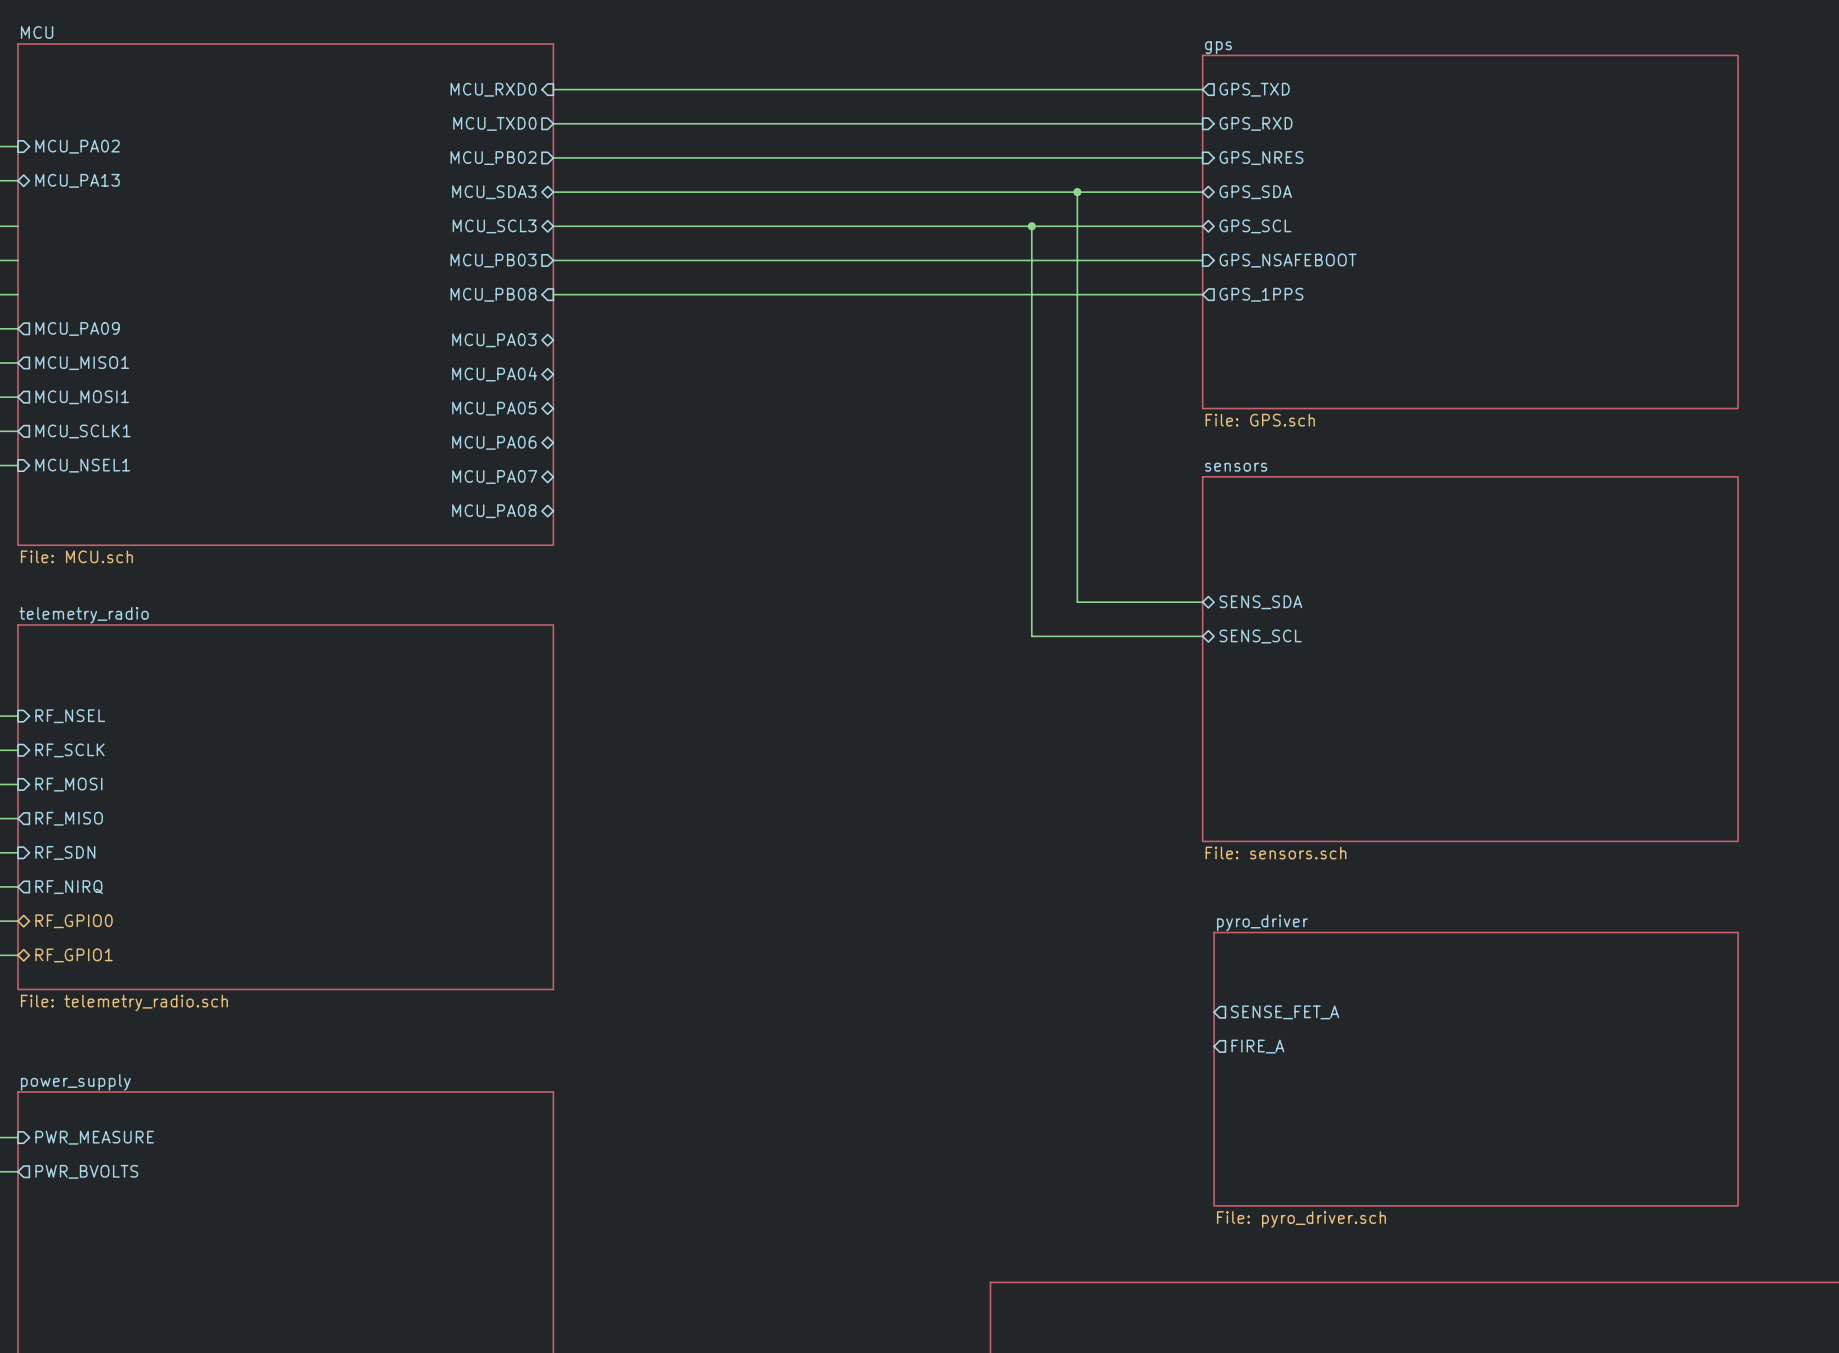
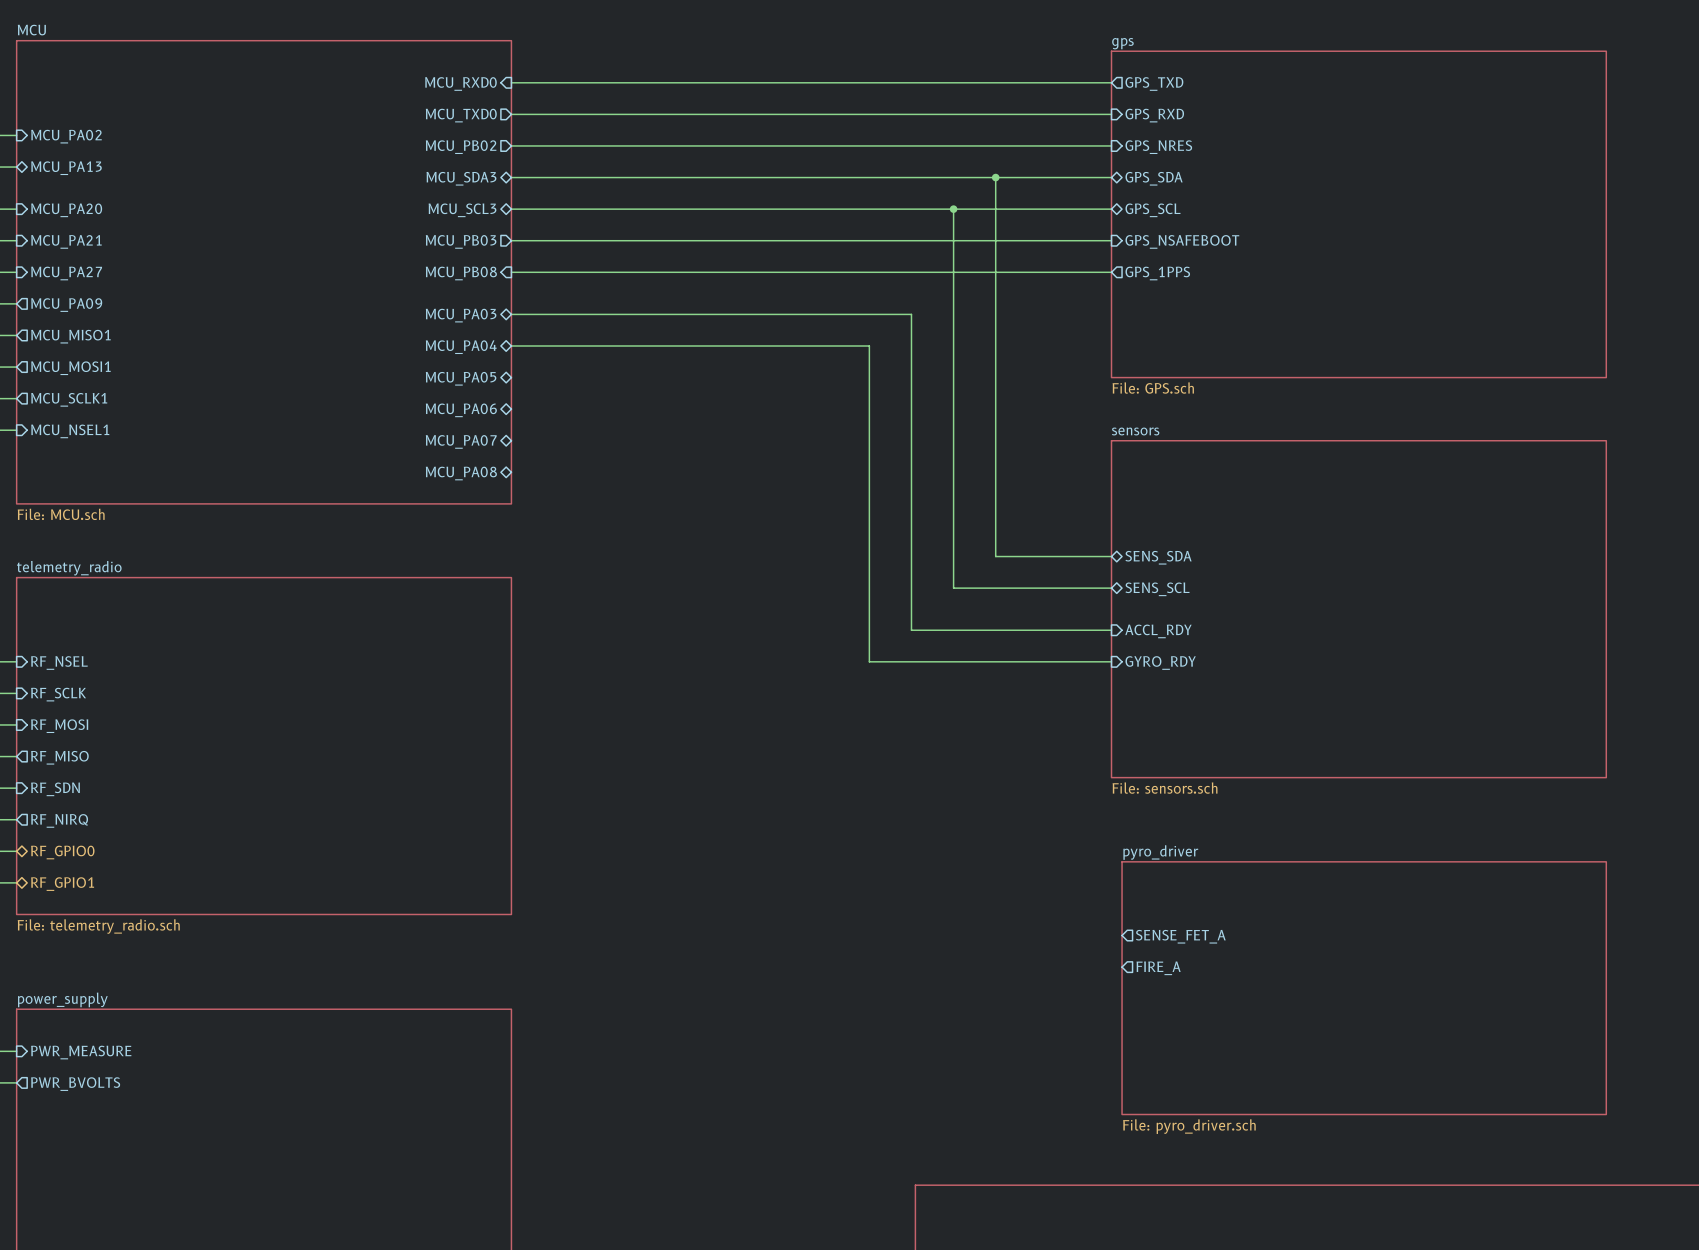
sheet pin: none -> MCU_PA20 (66, 210)
sheet pin: none -> MCU_PA21 (66, 241)
sheet pin: none -> MCU_PA27 (66, 273)
wire: none -> (511, 314) (911, 314) (911, 630) (1111, 630)
wire: none -> (511, 345) (869, 345) (869, 661) (1111, 661)
sheet pin: none -> ACCL_RDY (1158, 631)
sheet pin: none -> GYRO_RDY (1160, 663)

